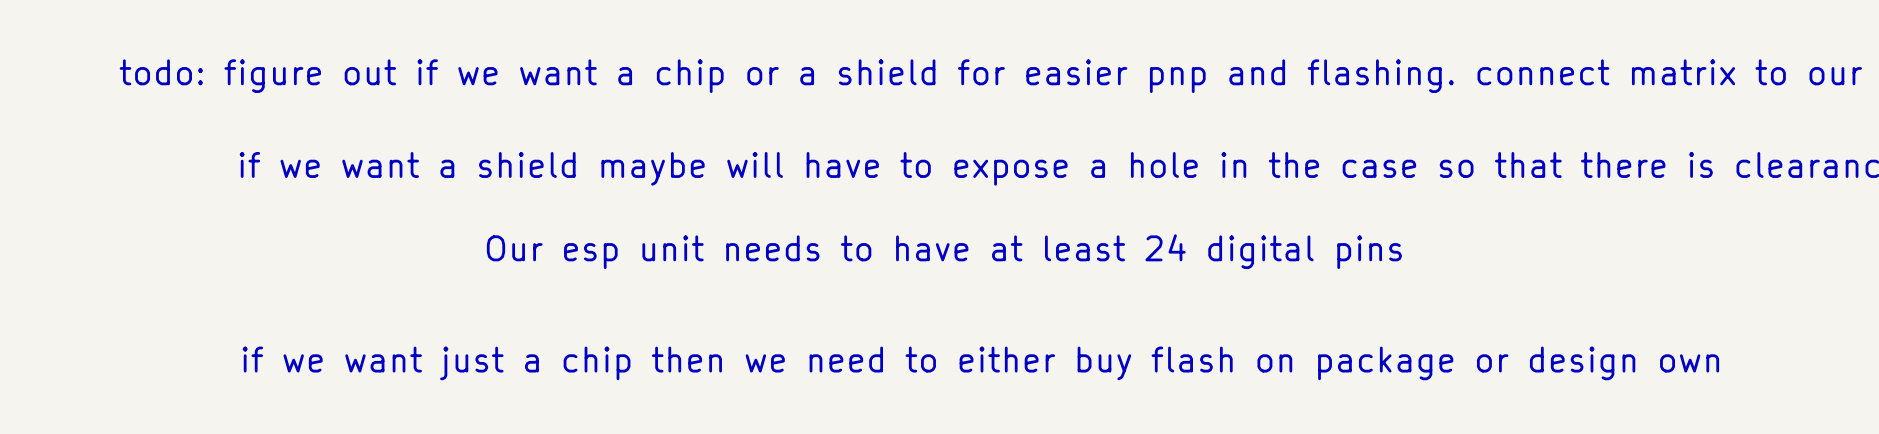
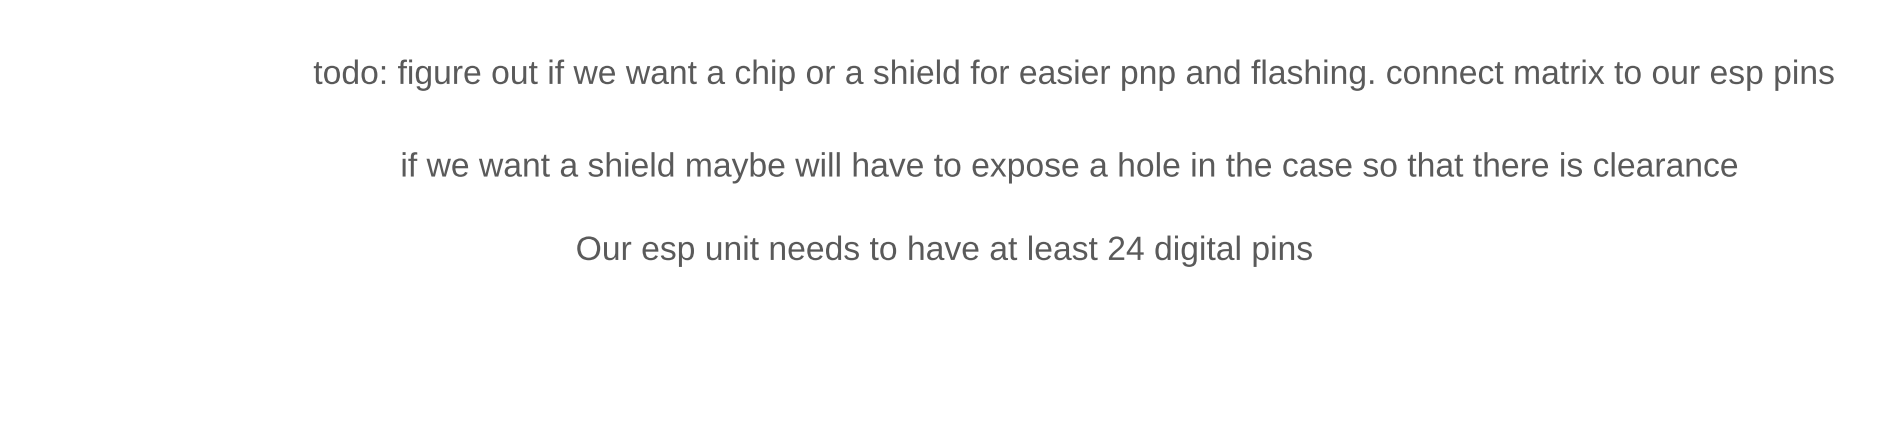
text: if we want just a chip then we need to either buy flash on package or design own (980, 363) -> none

